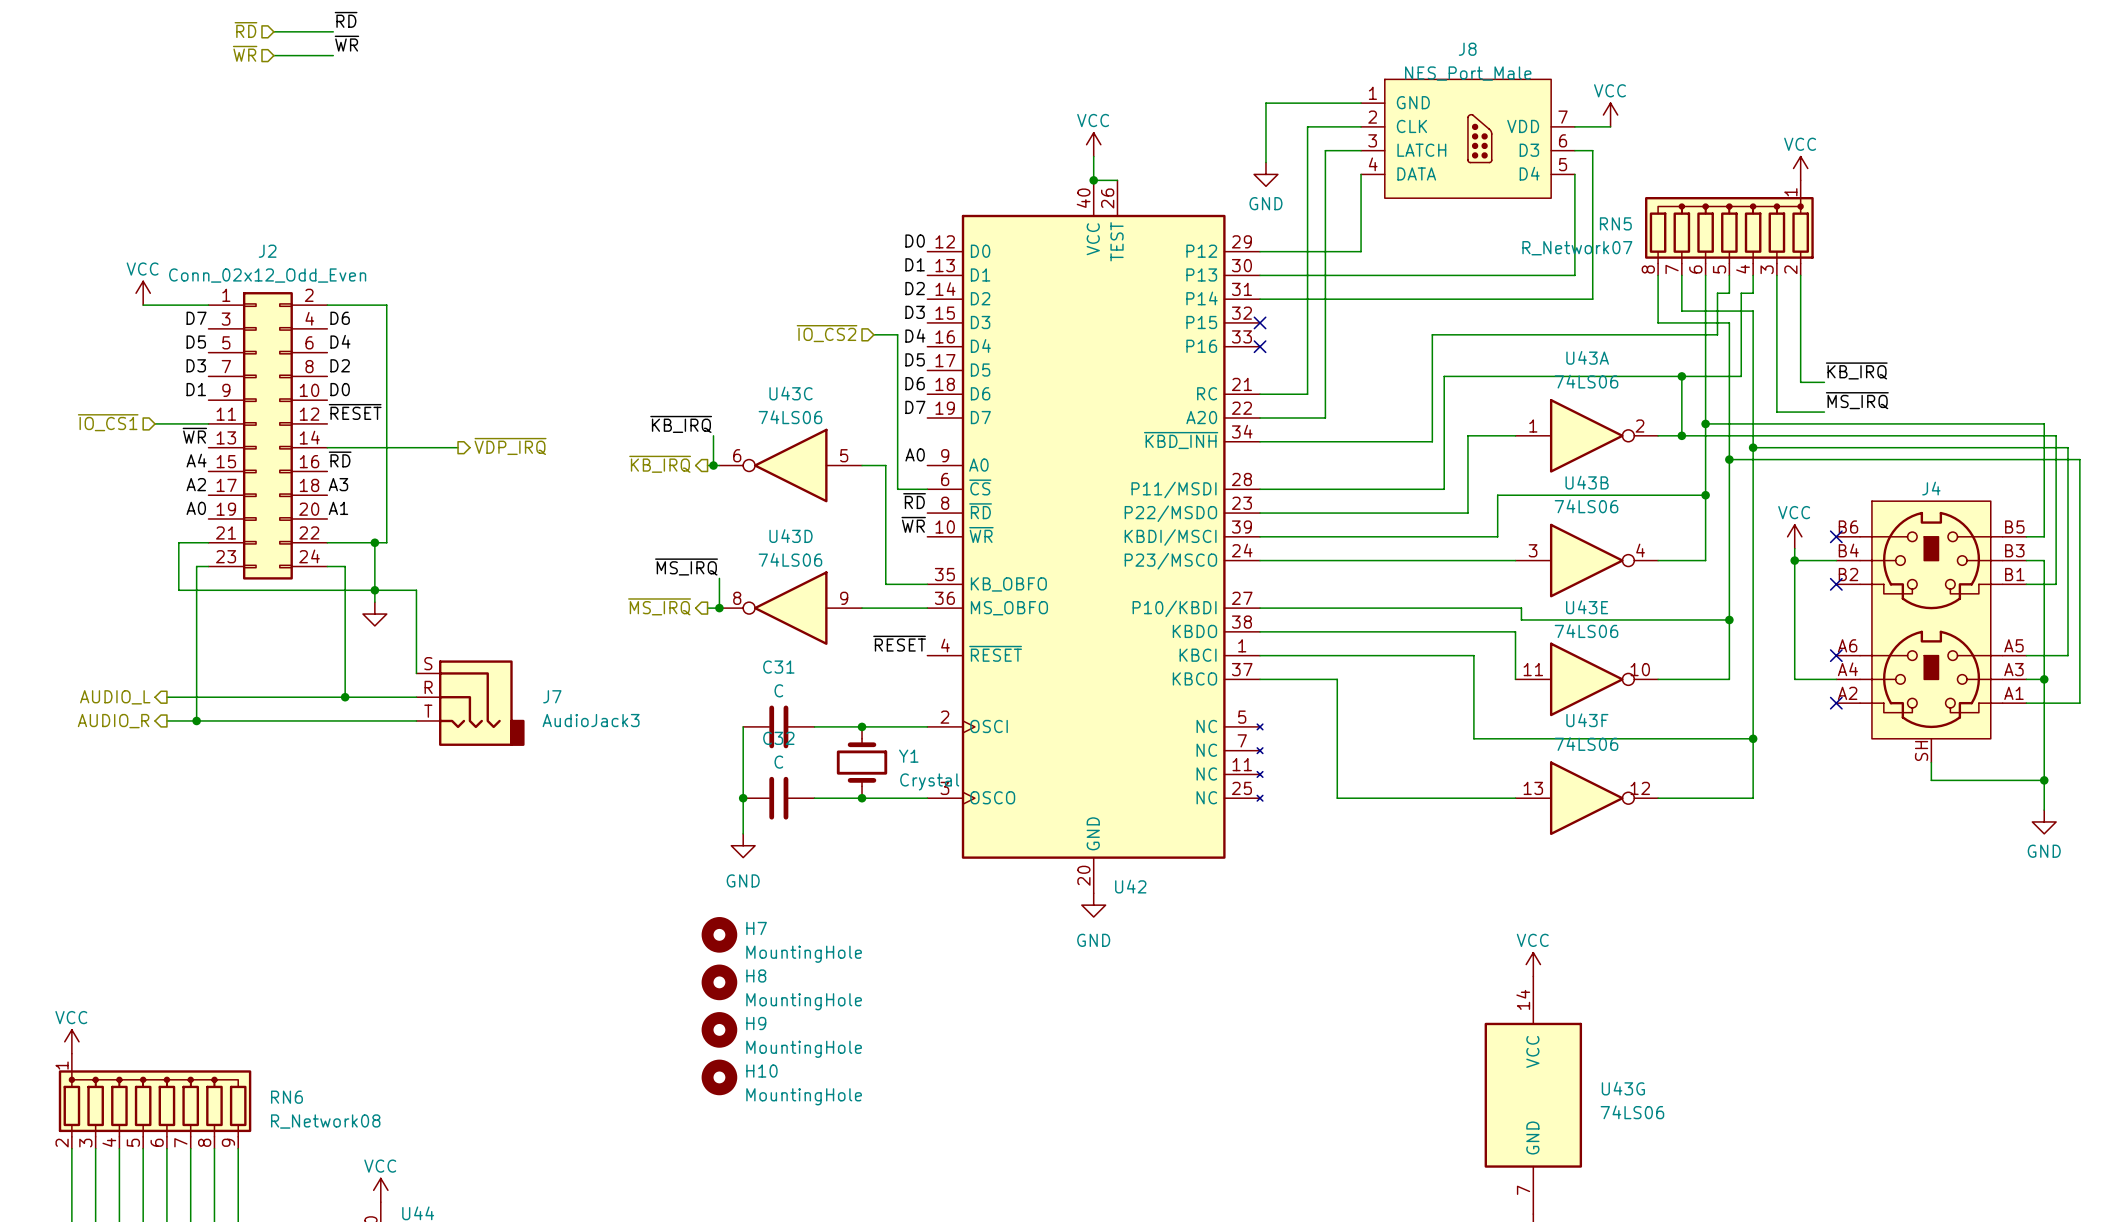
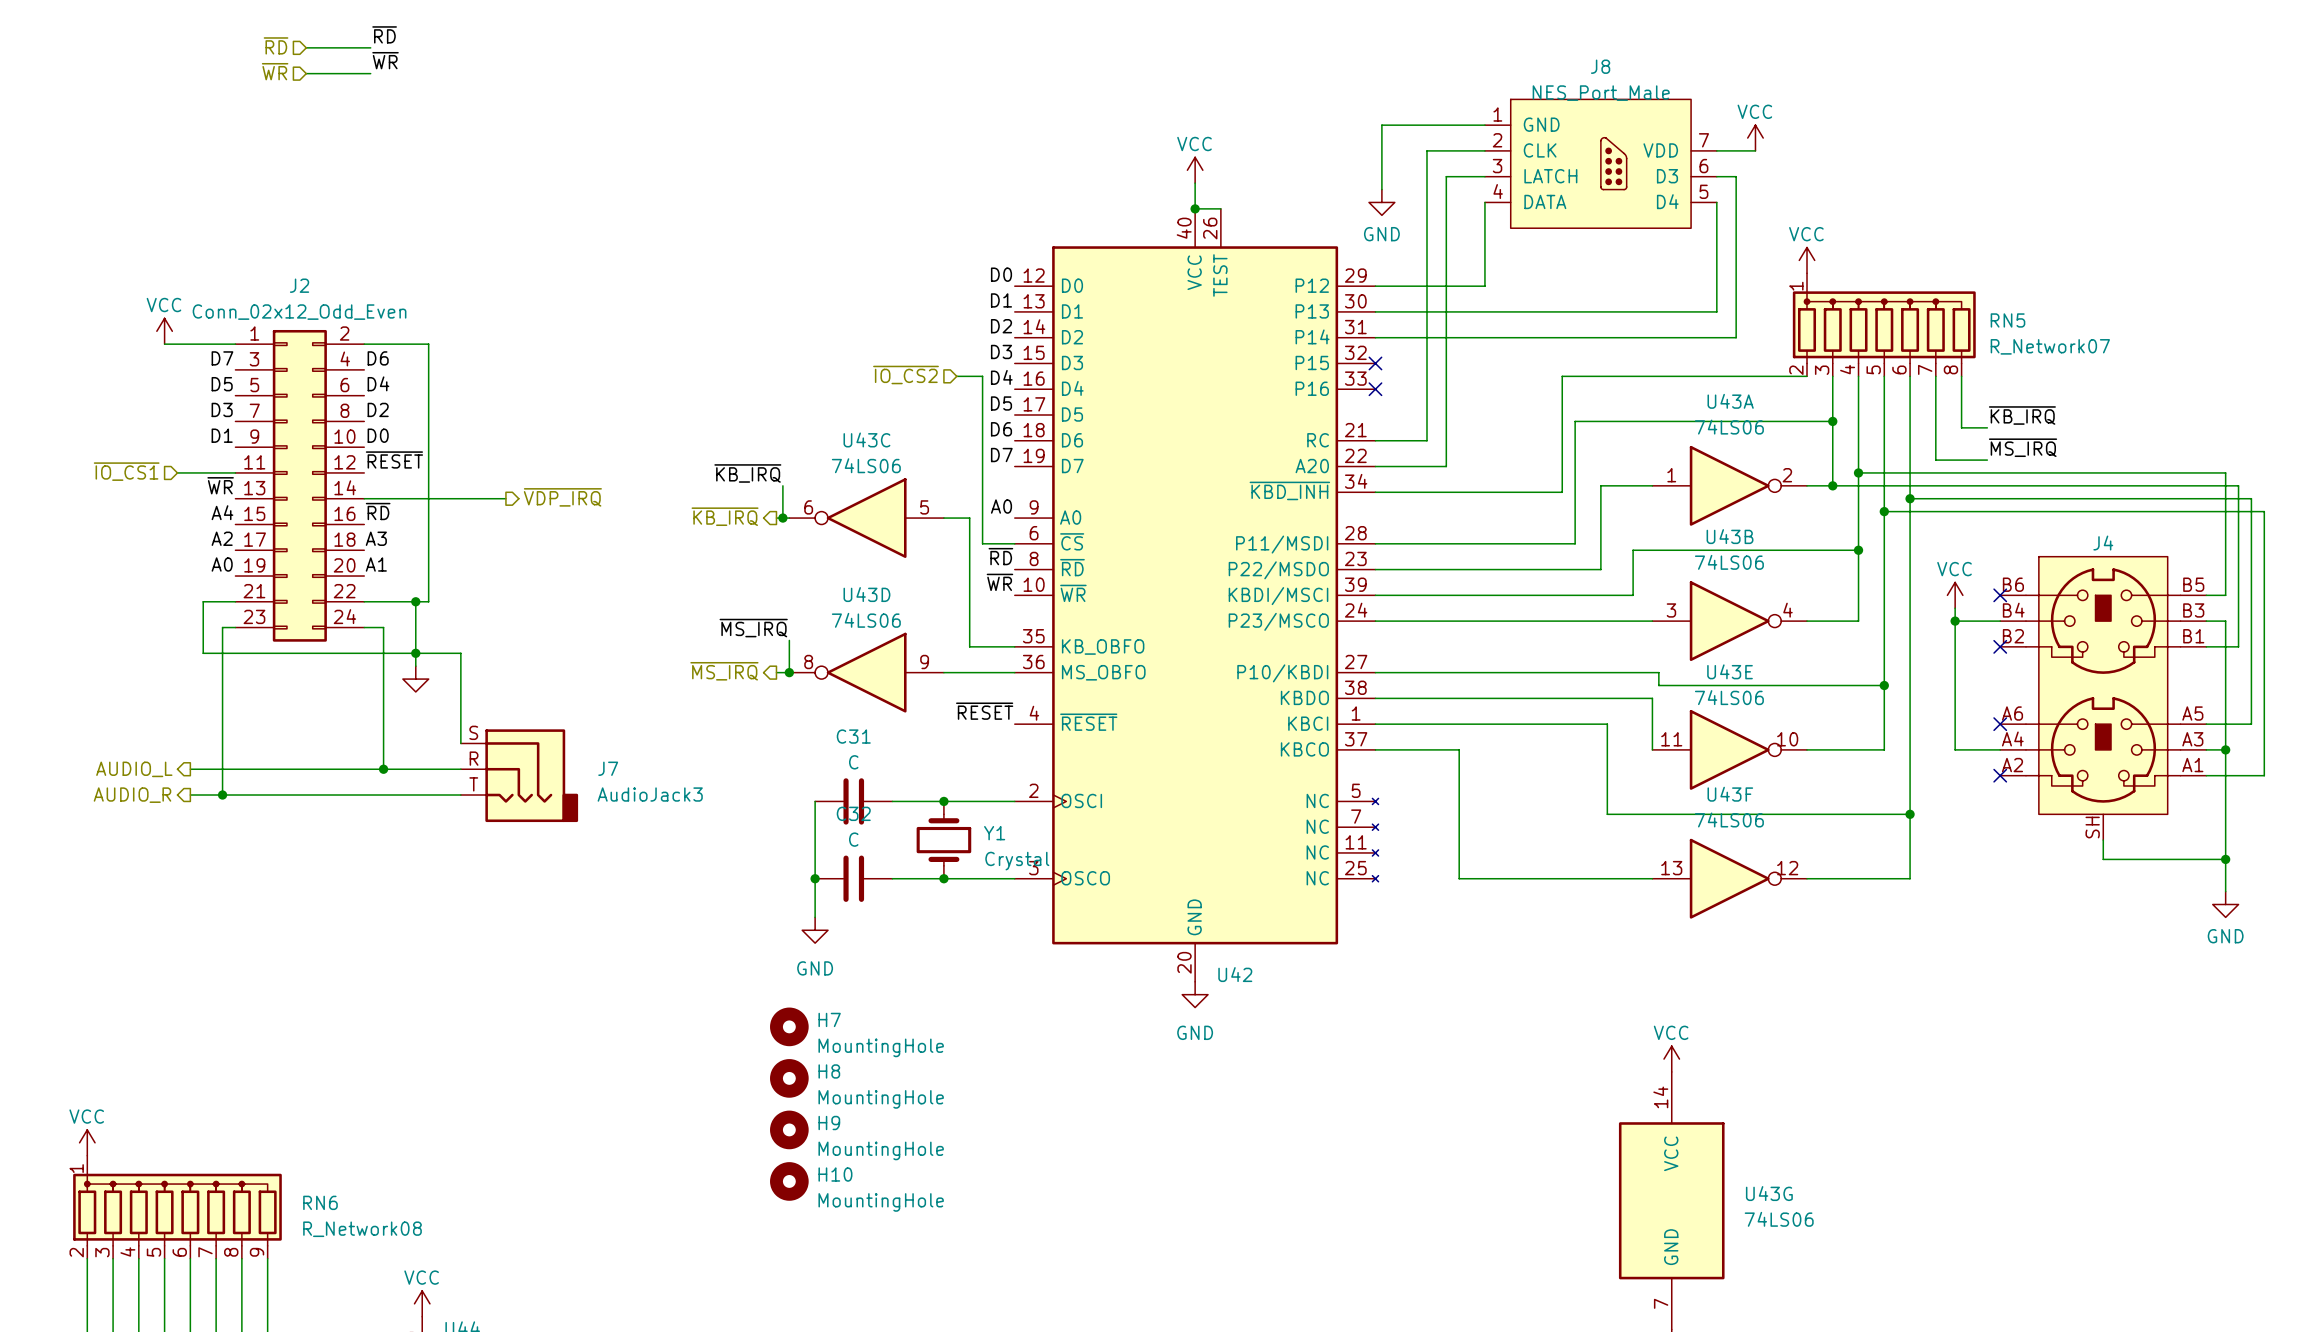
power symbol position: VCC (1800, 168) -> VCC (1807, 260)
RN5 flip: as is (1729, 230) -> left-right (1884, 327)
wire: (1658, 275) (1658, 322) (1729, 322) (1729, 334) -> none
wire: (1729, 275) (1729, 293) (1717, 293) (1717, 334) (1658, 334) -> none
wire: (1753, 275) (1753, 293) (1741, 293) (1741, 376) (1681, 376) -> (1832, 376) (1832, 421)

